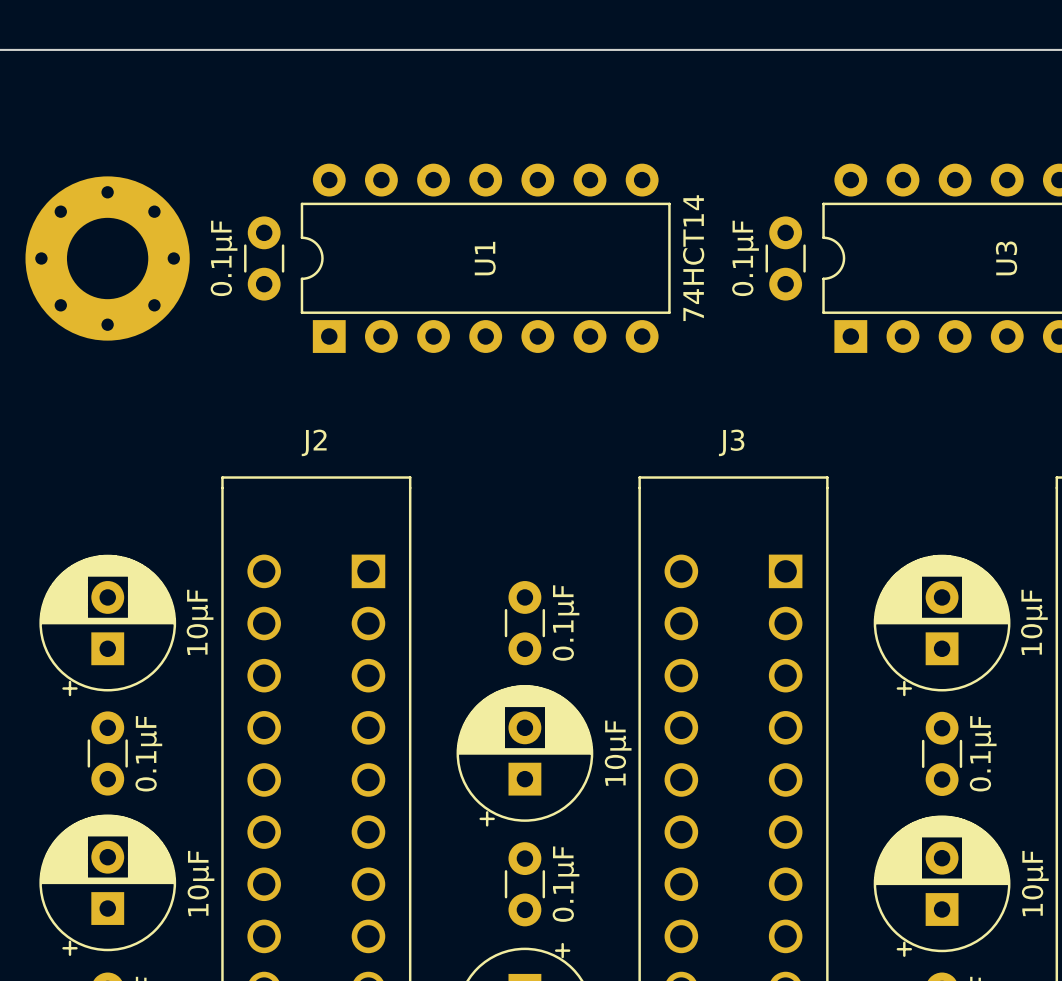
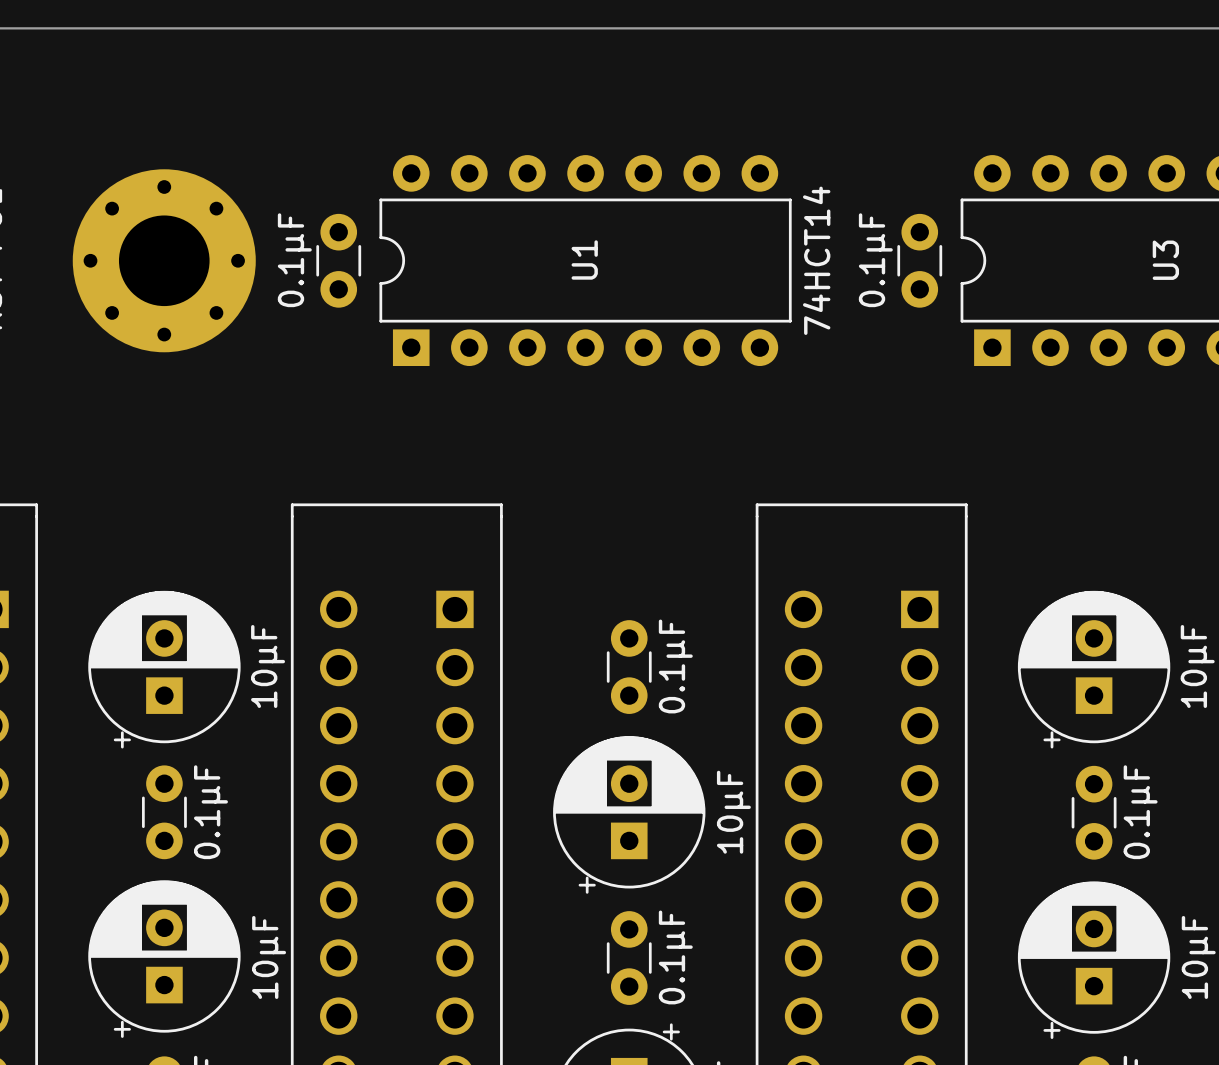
U1 text: none -> U1 (584, 260)
U1 name: U1 (485, 258) -> none
J2 name: J2 (314, 442) -> none
J3 name: J3 (731, 442) -> none

